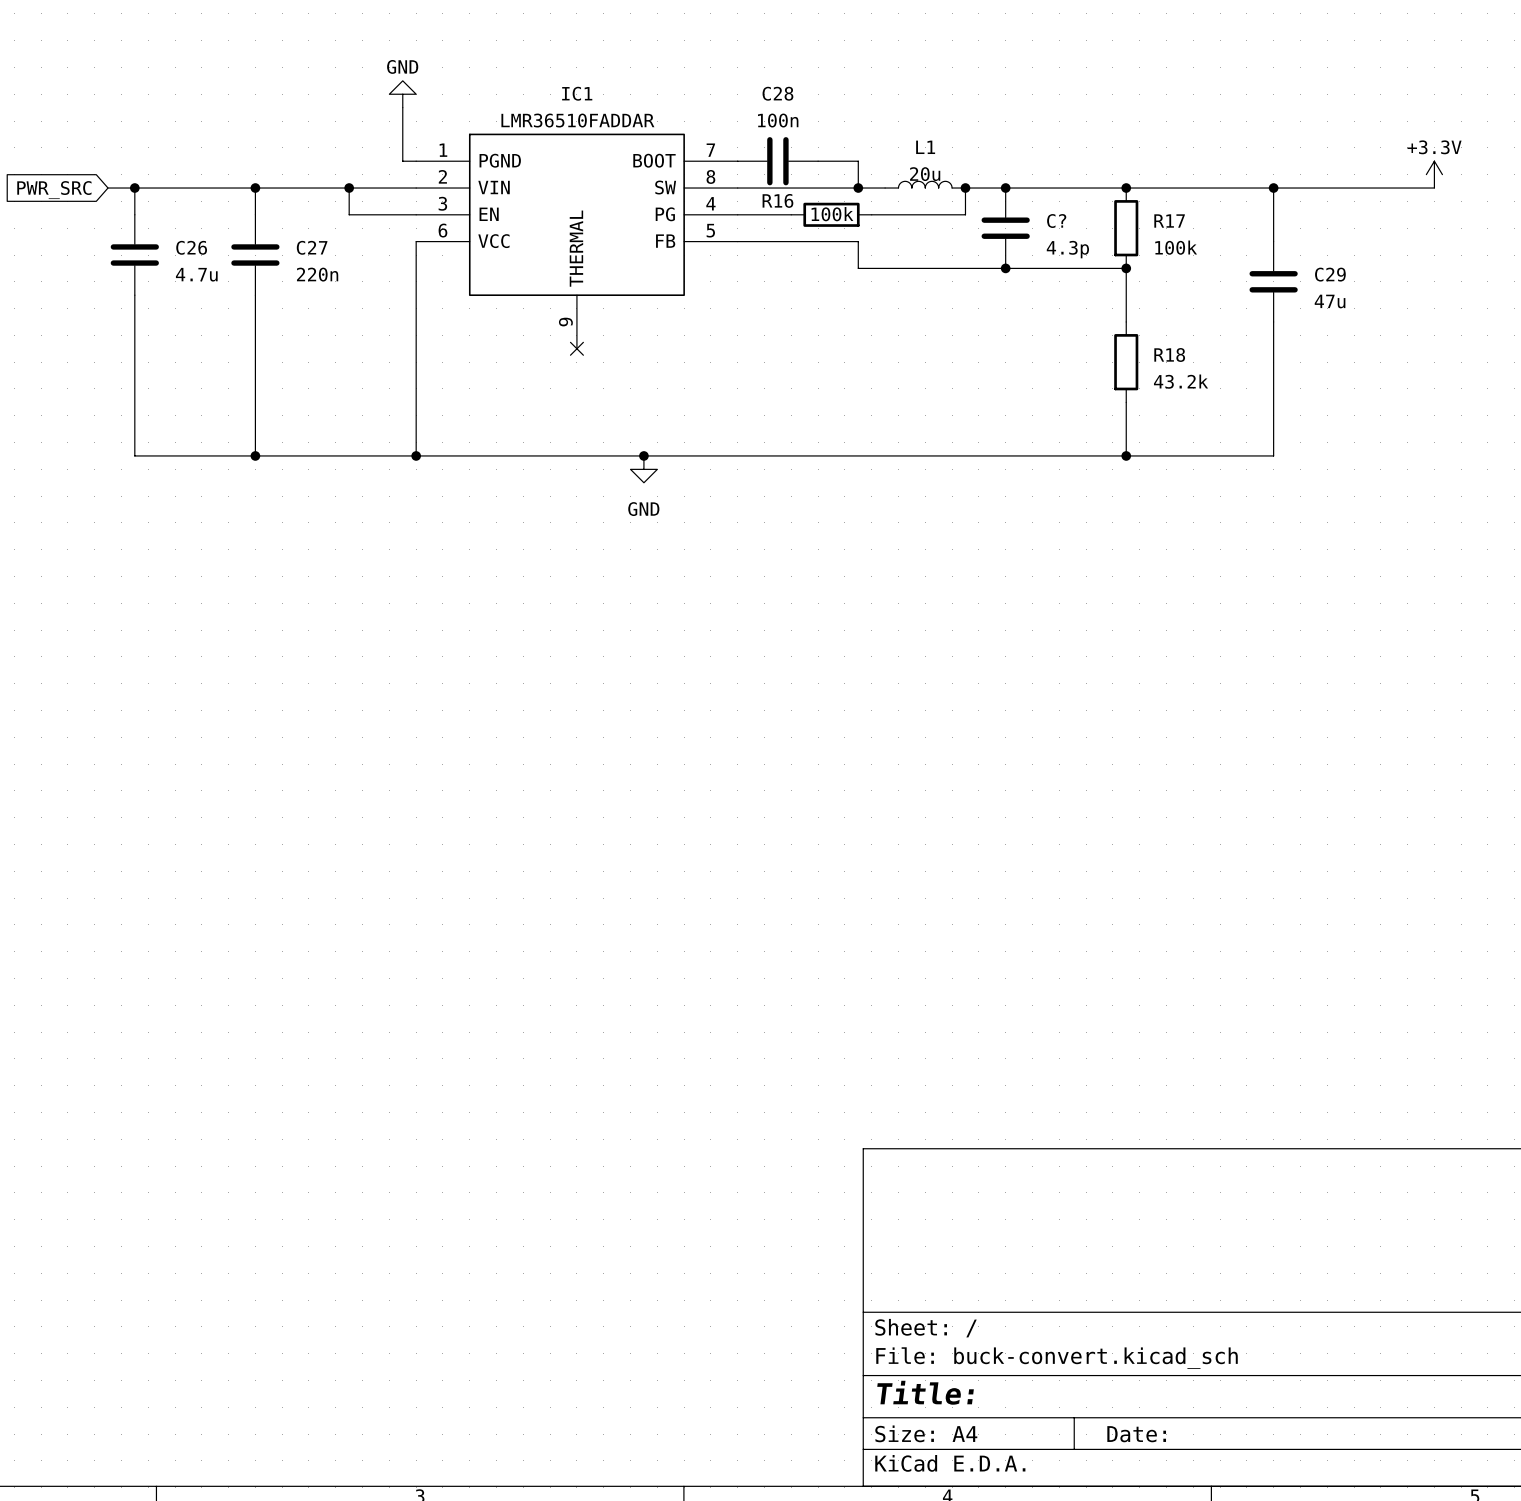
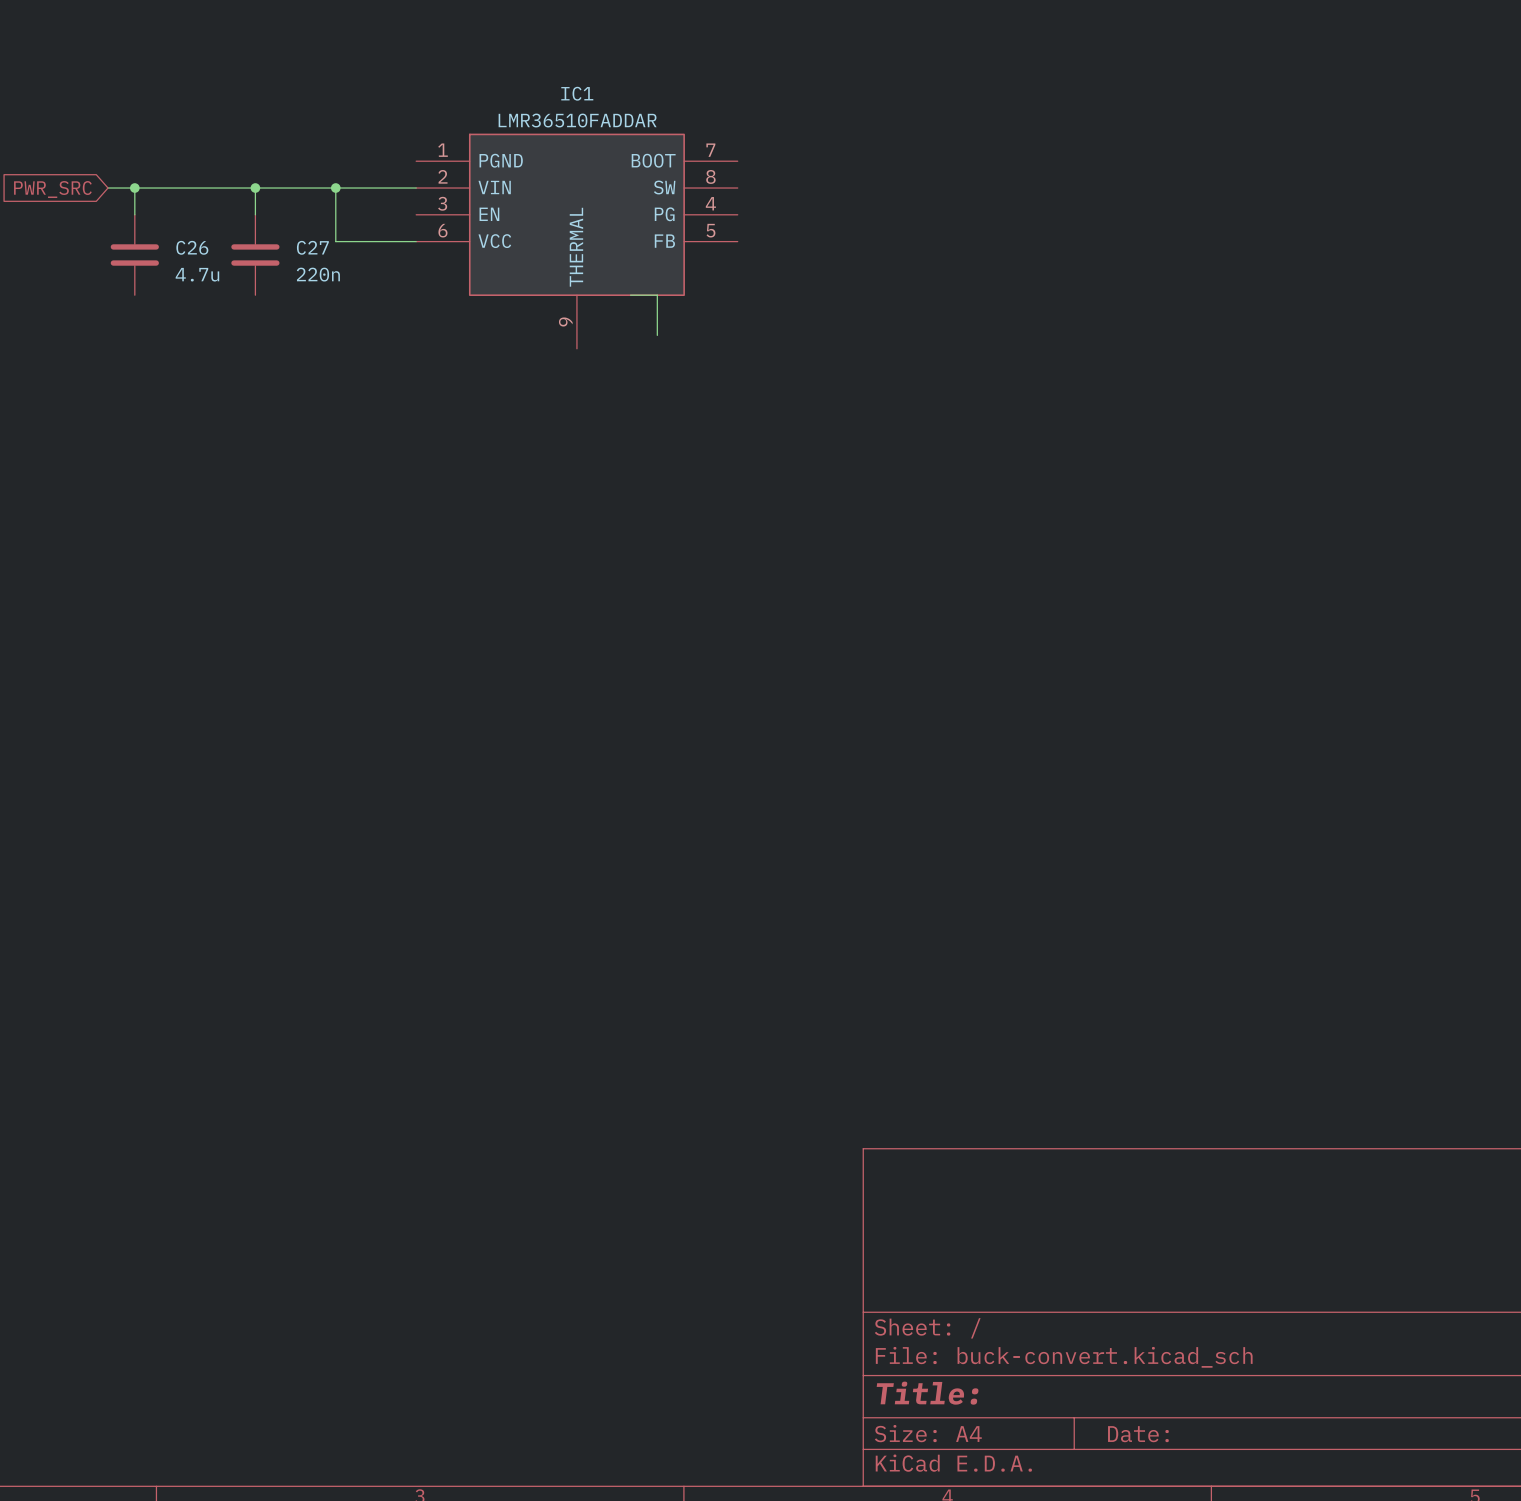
power symbol: GND (402, 94) -> none
wire: (402, 107) (402, 161) (416, 161) -> none
C28: 100n (777, 161) -> none
wire: (818, 161) (858, 161) (858, 188) -> none
power symbol: +3.3V (1434, 174) -> none
L1: 20u (925, 184) -> none
wire: (349, 188) (349, 214) (416, 214) -> none
junction position: (349, 188) -> (335, 188)
wire: (737, 188) (885, 188) -> none
junction: (858, 188) -> none
junction: (965, 188) -> none
junction: (1005, 188) -> none
junction: (1126, 188) -> none
wire: (1273, 188) (1273, 241) -> none
junction: (1273, 188) -> none
wire: (1434, 188) (965, 188) (965, 214) (871, 214) -> none
wire: (737, 214) (791, 214) -> none
R16: 100k (831, 214) -> none
C?: 4.3p (1005, 228) -> none
R17: 100k (1126, 228) -> none
wire: (416, 241) (416, 455) -> (416, 241) (335, 241) (335, 188)
wire: (737, 241) (858, 241) (858, 268) (1126, 268) (1126, 321) -> none
junction: (1005, 268) -> none
junction: (1126, 268) -> none
C29: 47u (1273, 281) -> none
wire: (134, 295) (134, 455) (1273, 455) (1273, 321) -> none
wire: (255, 295) (255, 455) -> none
wire: none -> (630, 295) (657, 295) (657, 335)
no-connect mark: (576, 348) -> none
R18: 43.2k (1126, 362) -> none
wire: (1126, 402) (1126, 455) -> none
junction: (255, 455) -> none
junction: (416, 455) -> none
junction: (643, 455) -> none
junction: (1126, 455) -> none
power symbol: GND (643, 469) -> none

